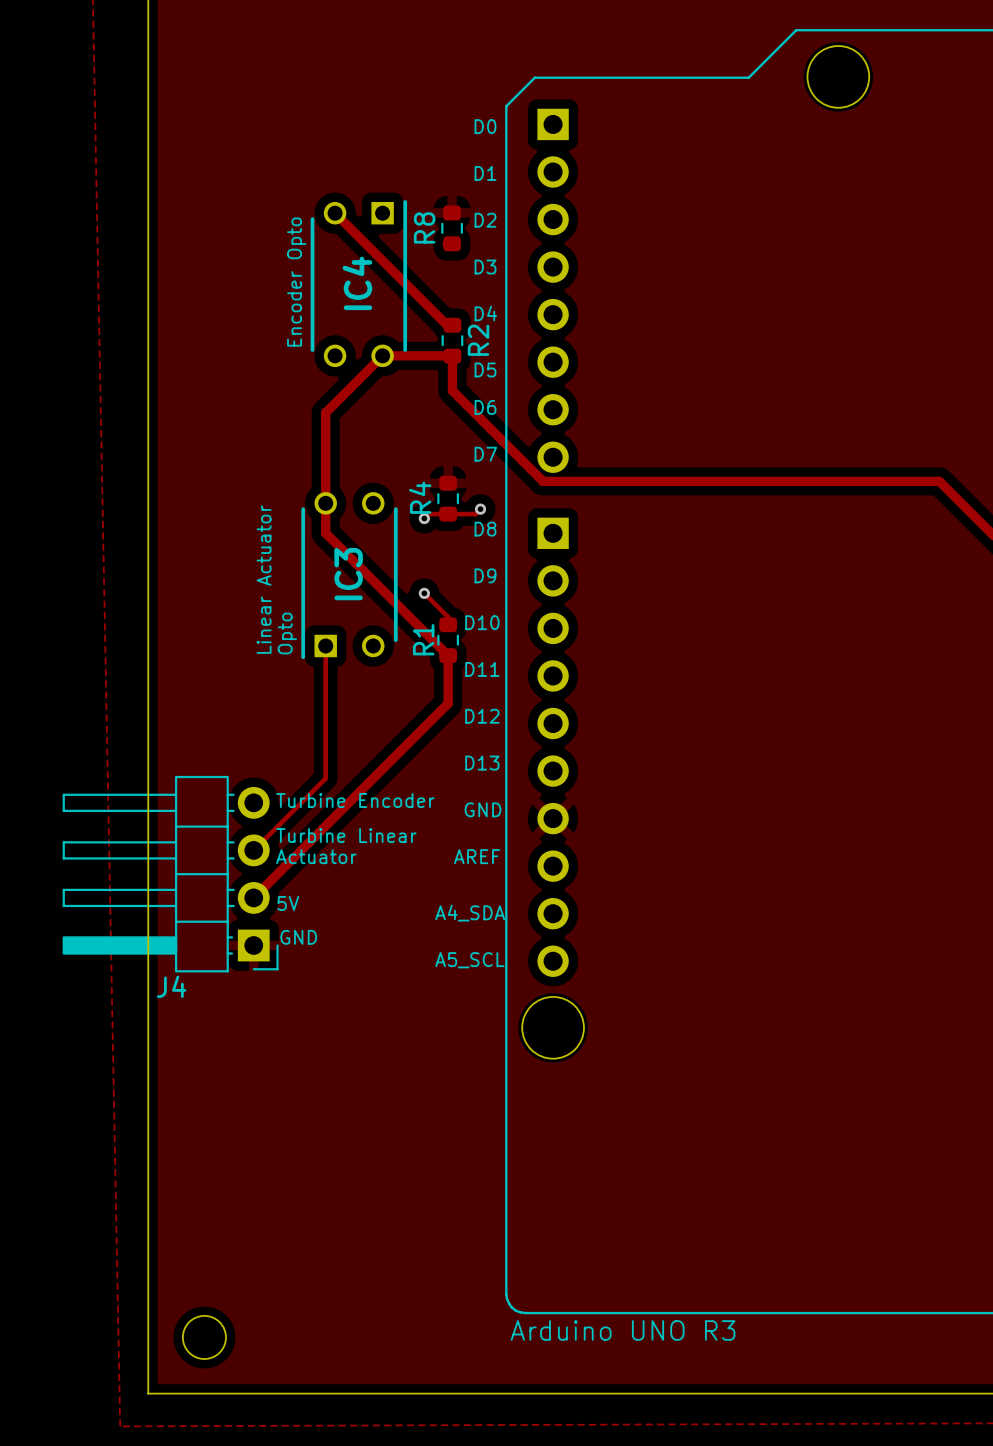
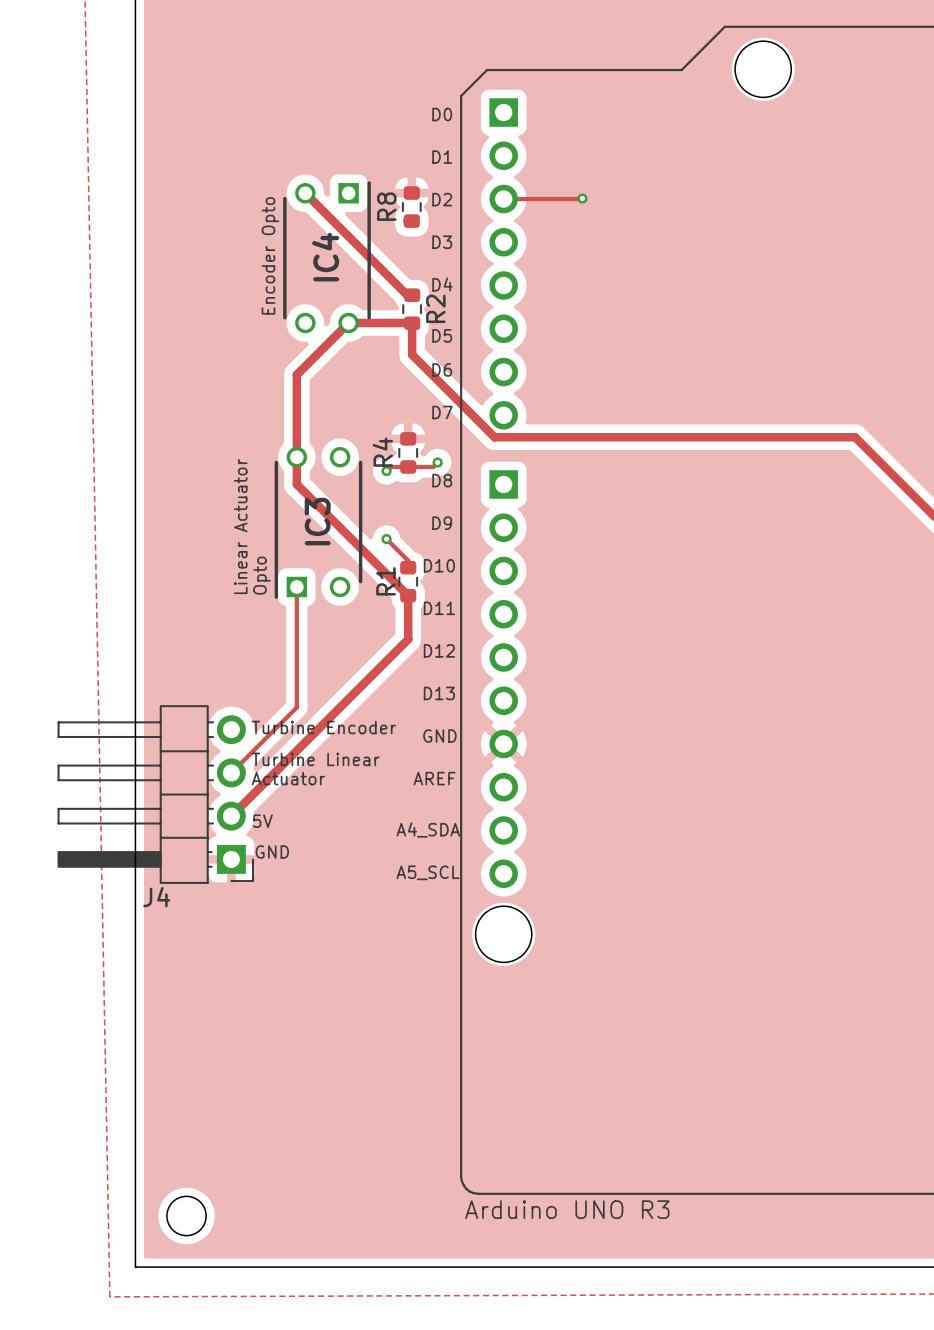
track: none -> (582, 198) (503, 199)
via: none -> (582, 198)

